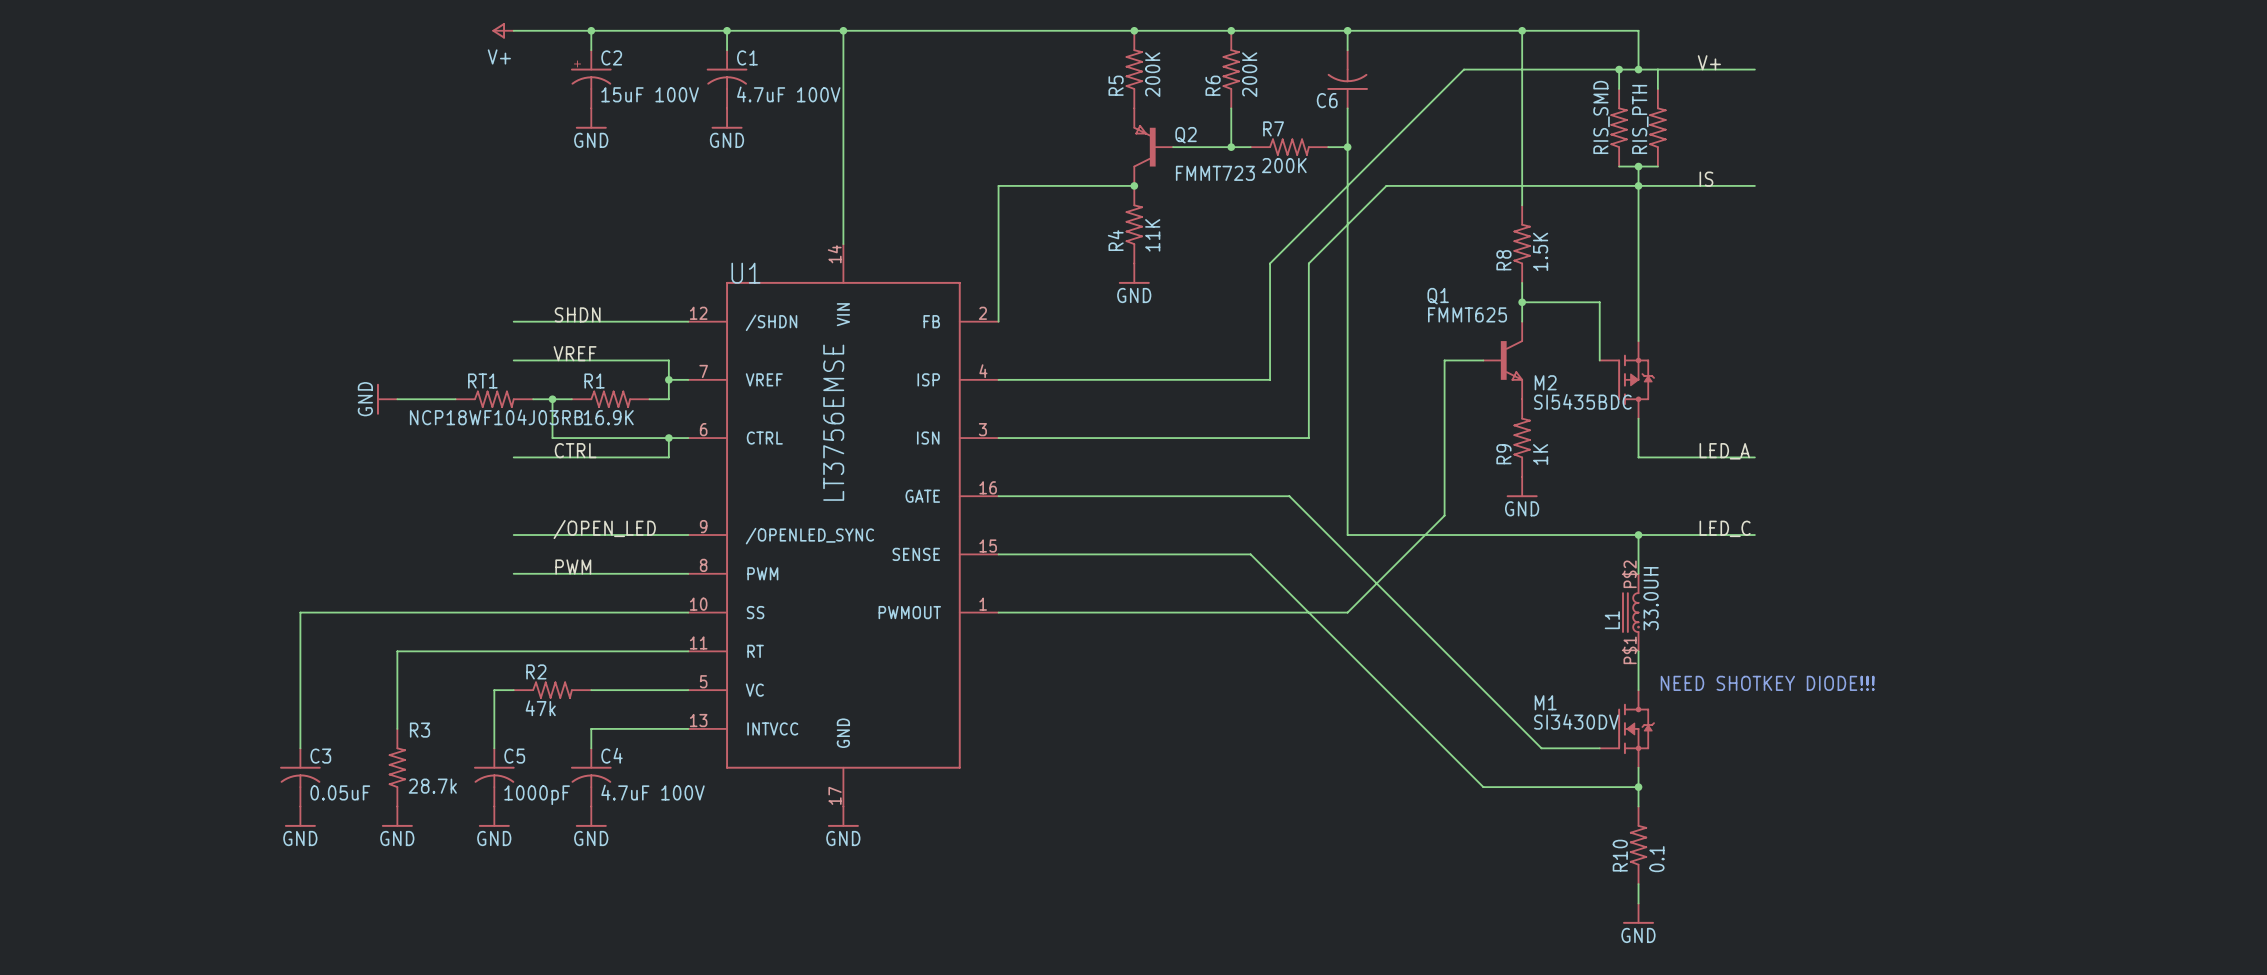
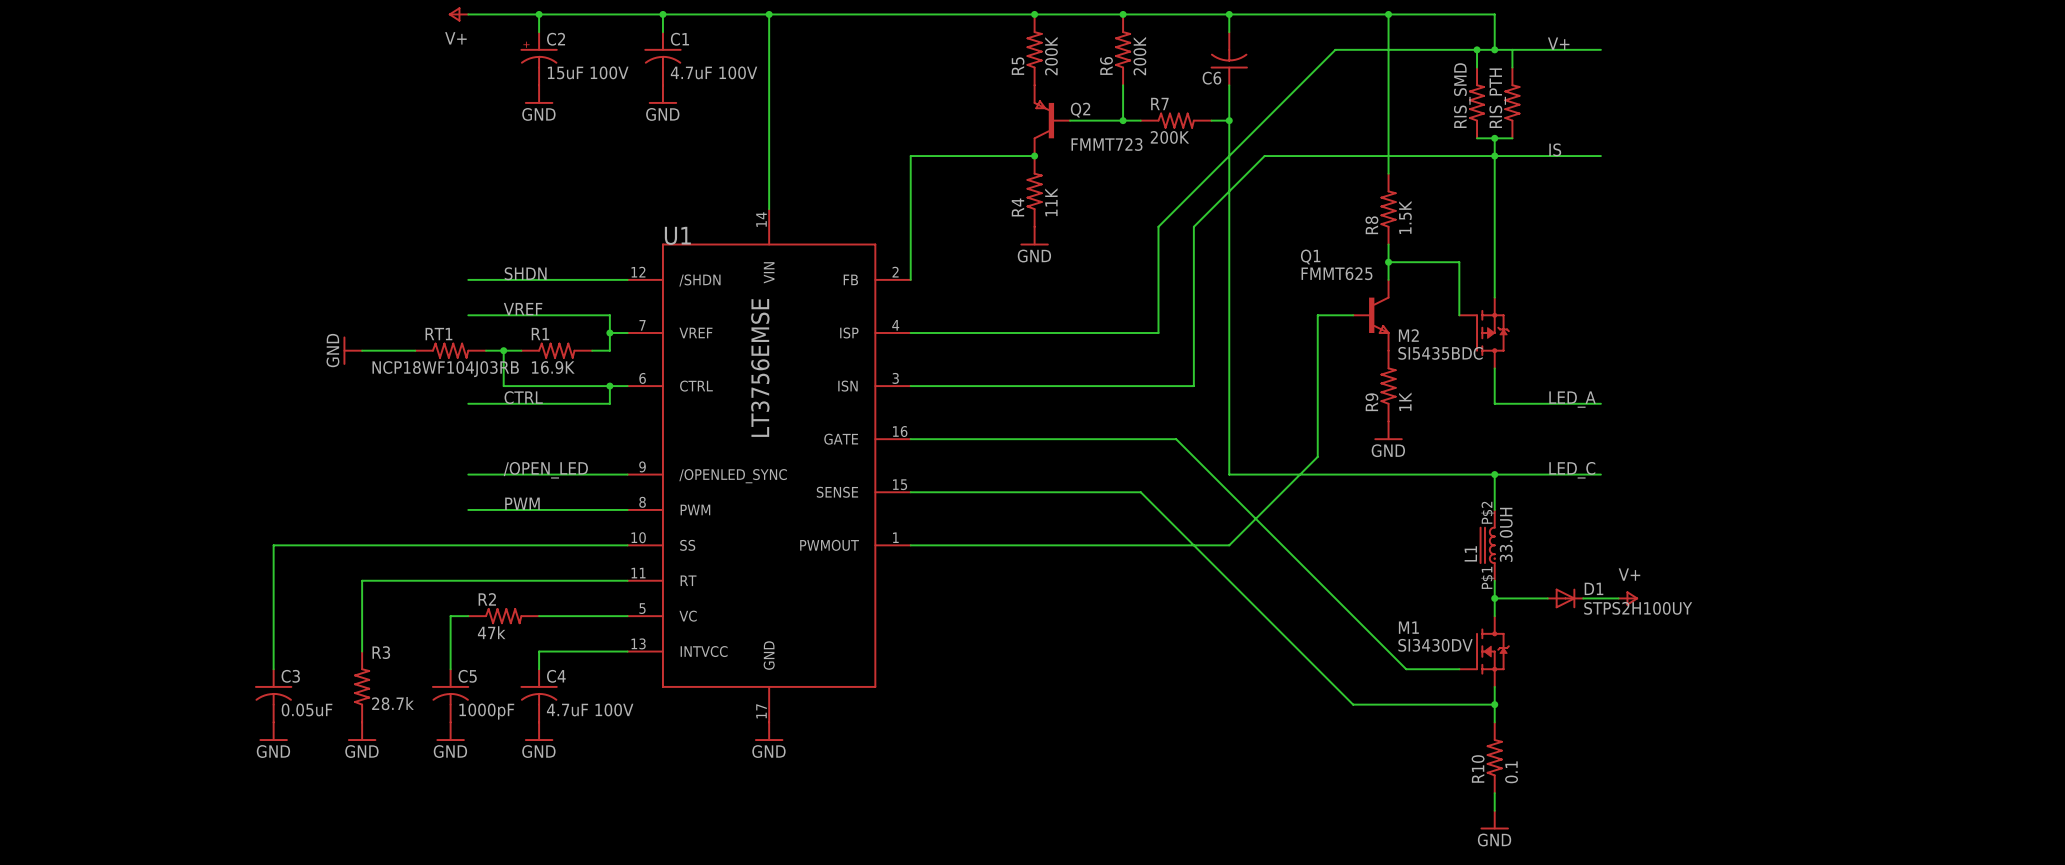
wire: none -> (1494, 598) (1547, 598)
junction: none -> (1494, 598)
D1: none -> STPS2H100UY (1565, 598)
wire: none -> (1583, 598) (1618, 598)
power symbol: none -> V+ (1628, 598)
text: NEED SHOTKEY DIODE!!! (1767, 683) -> none

